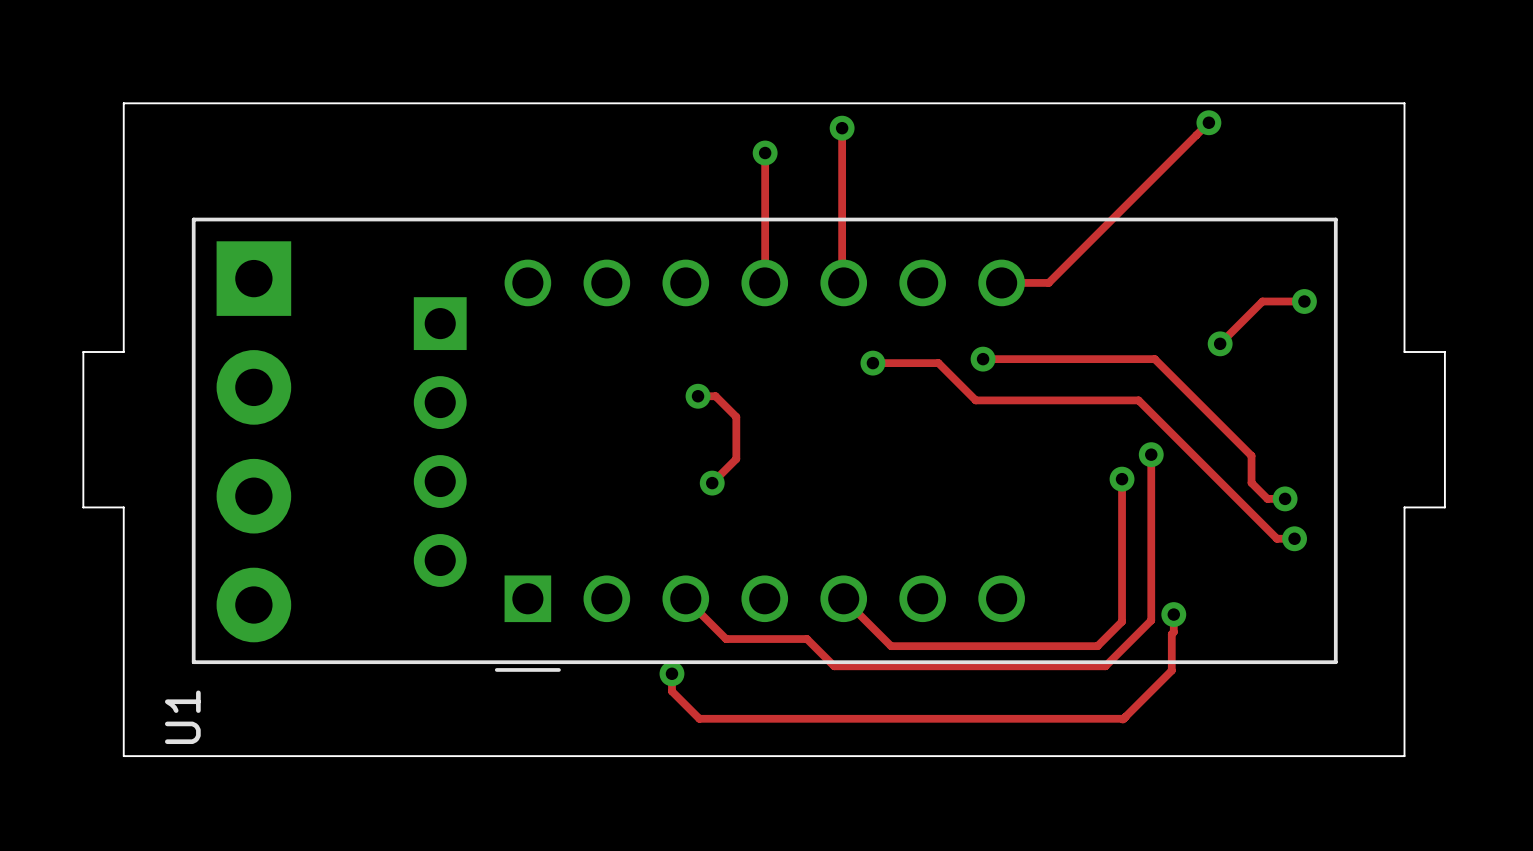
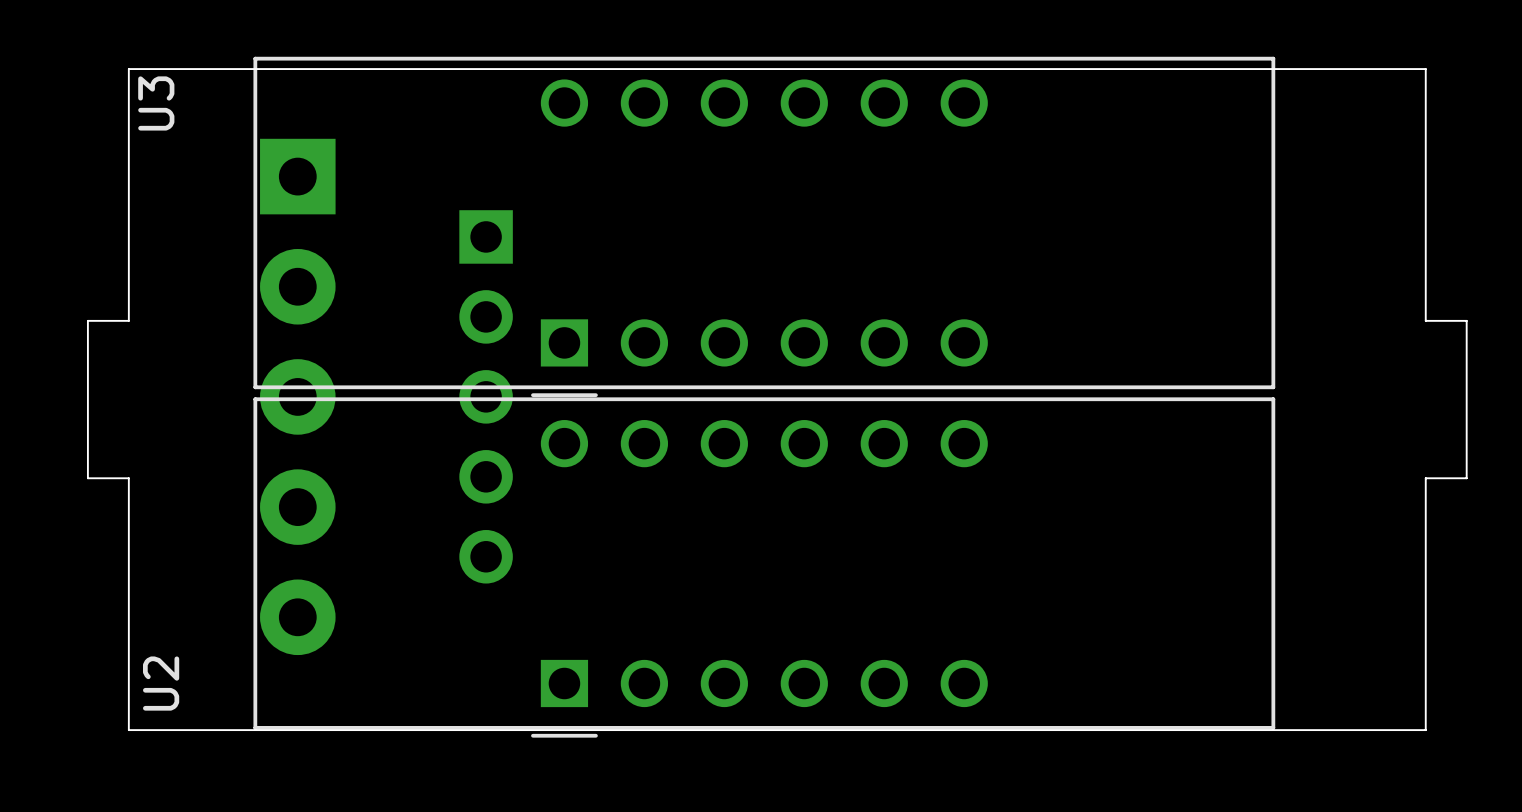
track: (1208, 122) (1048, 282) (1001, 282) -> none
via: (1208, 122) -> none
track: (842, 128) (842, 281) (843, 282) -> none
via: (842, 128) -> none
track: (765, 153) (765, 282) -> none
via: (765, 153) -> none
U3: none -> (764, 226)
track: (1304, 301) (1262, 301) (1220, 343) -> none
via: (1304, 301) -> none
via: (1220, 343) -> none
track: (983, 359) (1154, 359) (1251, 455) (1251, 482) (1267, 498) (1285, 498) -> none
via: (983, 359) -> none
track: (872, 363) (938, 363) (975, 400) (1138, 400) (1276, 538) (1294, 538) -> none
via: (872, 363) -> none
track: (698, 396) (715, 396) (736, 416) (736, 459) (712, 483) -> none
via: (698, 396) -> none
part: none -> (297, 396)
part: none -> (486, 396)
part: (253, 441) -> none
part: (440, 442) -> none
U1: (764, 444) -> none
track: (1151, 454) (1151, 620) (1105, 666) (834, 666) (806, 639) (726, 639) (685, 598) -> none
via: (1151, 454) -> none
track: (1122, 479) (1122, 621) (1097, 646) (891, 646) (843, 598) -> none
via: (1122, 479) -> none
via: (712, 483) -> none
via: (1285, 498) -> none
via: (1294, 538) -> none
U2: none -> (764, 567)
track: (1173, 614) (1171, 670) (1122, 719) -> none
via: (1173, 614) -> none
track: (671, 673) (671, 691) (699, 718) (1123, 718) -> none
via: (671, 673) -> none

